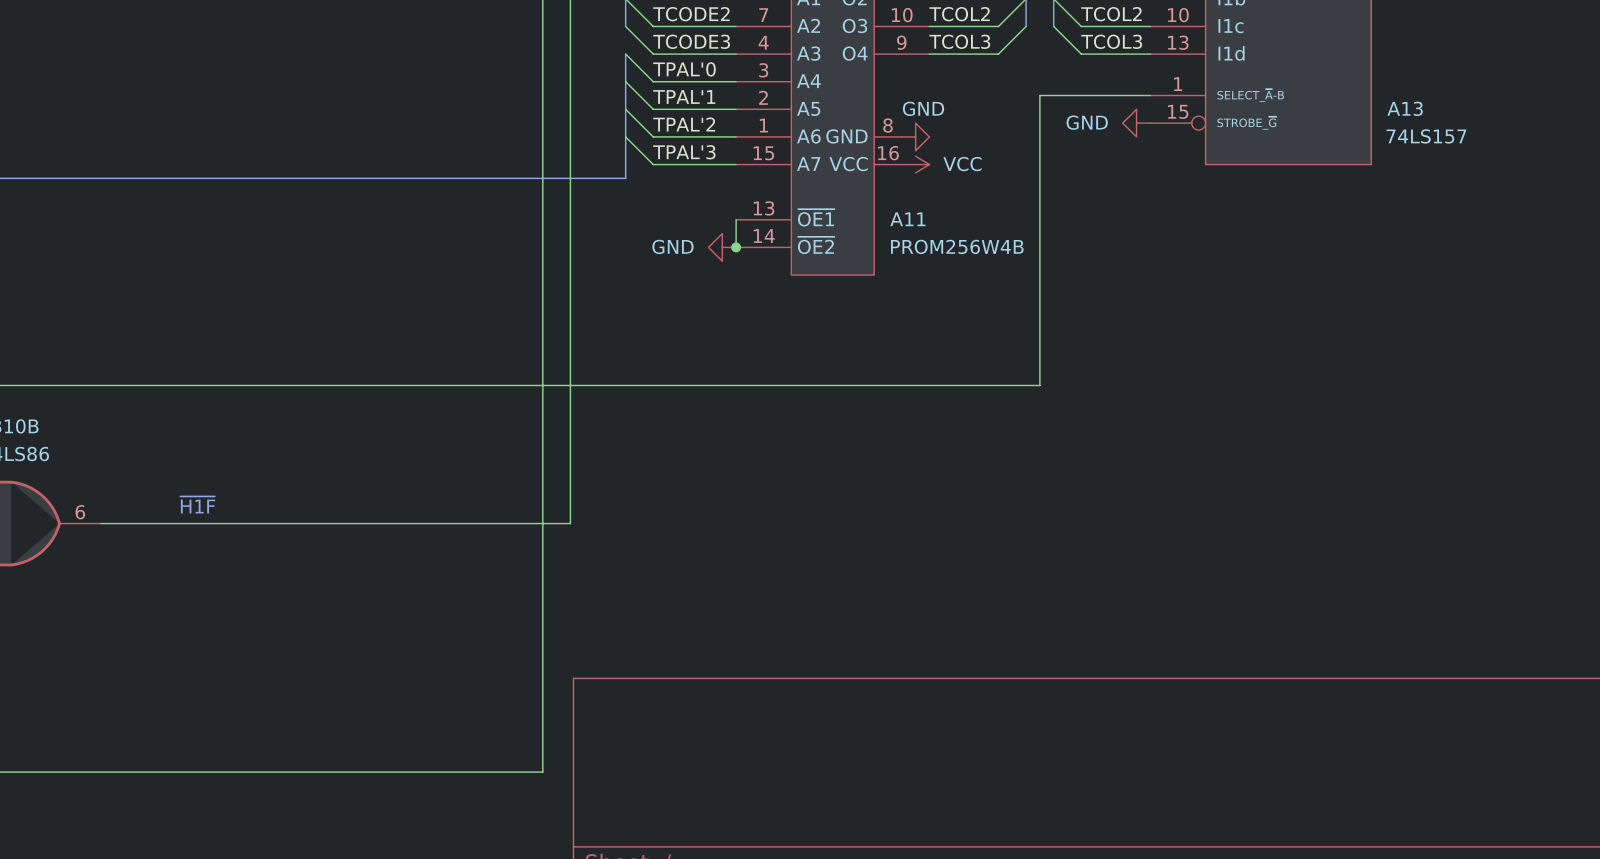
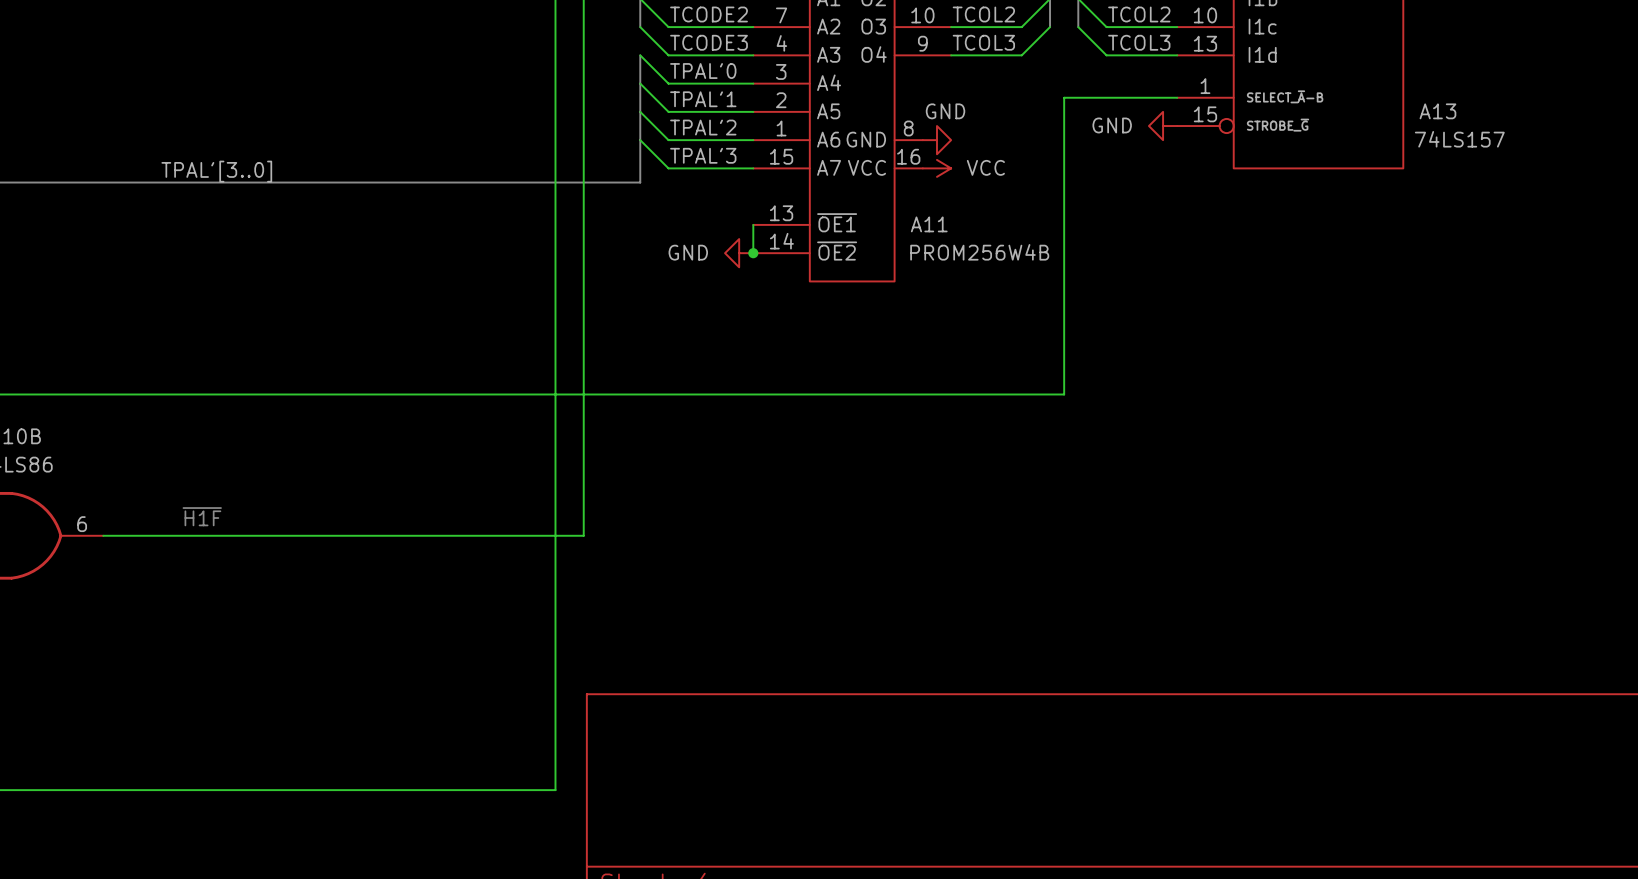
label: none -> TPAL'[3..0] (216, 171)

